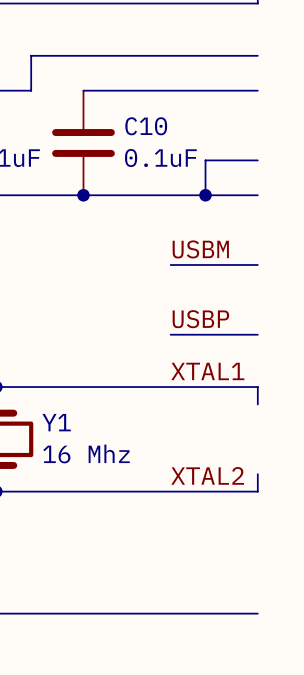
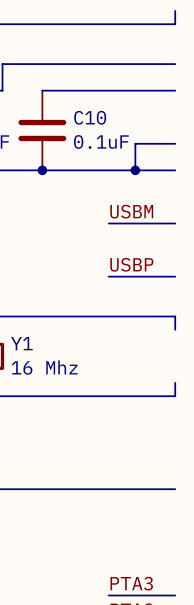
label: XTAL1 (207, 371) -> none
label: XTAL2 (207, 475) -> none

